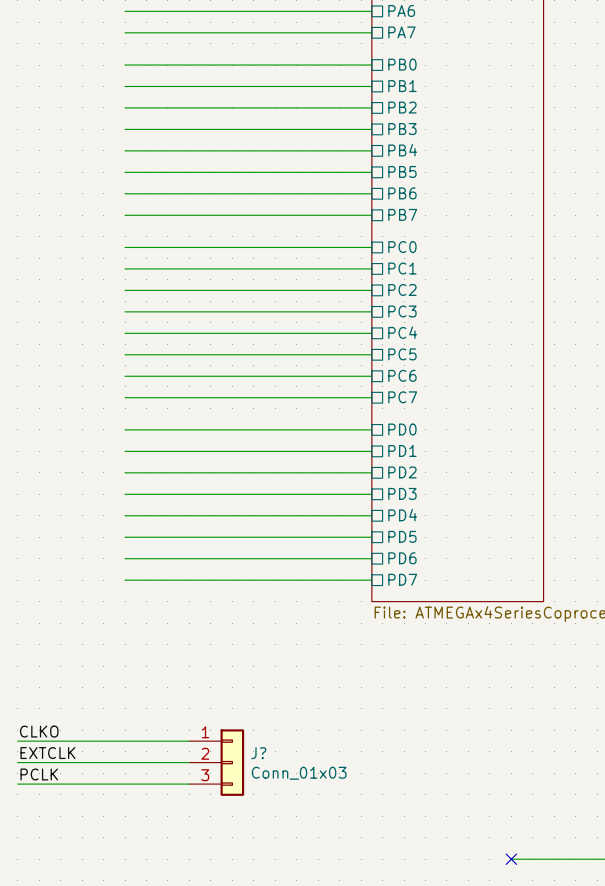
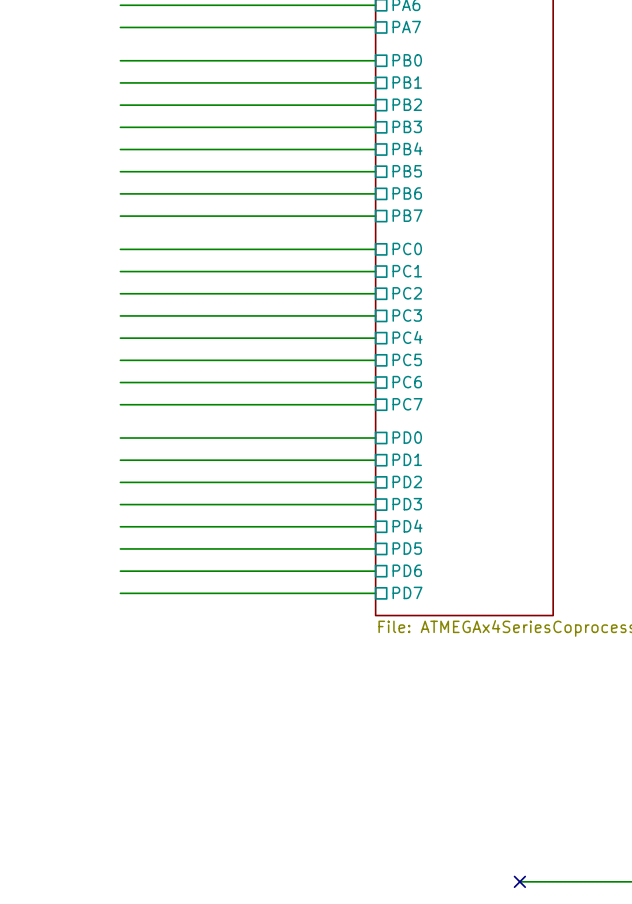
label: CLKO (39, 731) -> none
wire: (17, 741) (189, 741) -> none
label: EXTCLK (47, 753) -> none
wire: (17, 762) (189, 762) -> none
J?: Conn_01x03 (216, 762) -> none
label: PCLK (39, 774) -> none
wire: (17, 784) (189, 784) -> none

